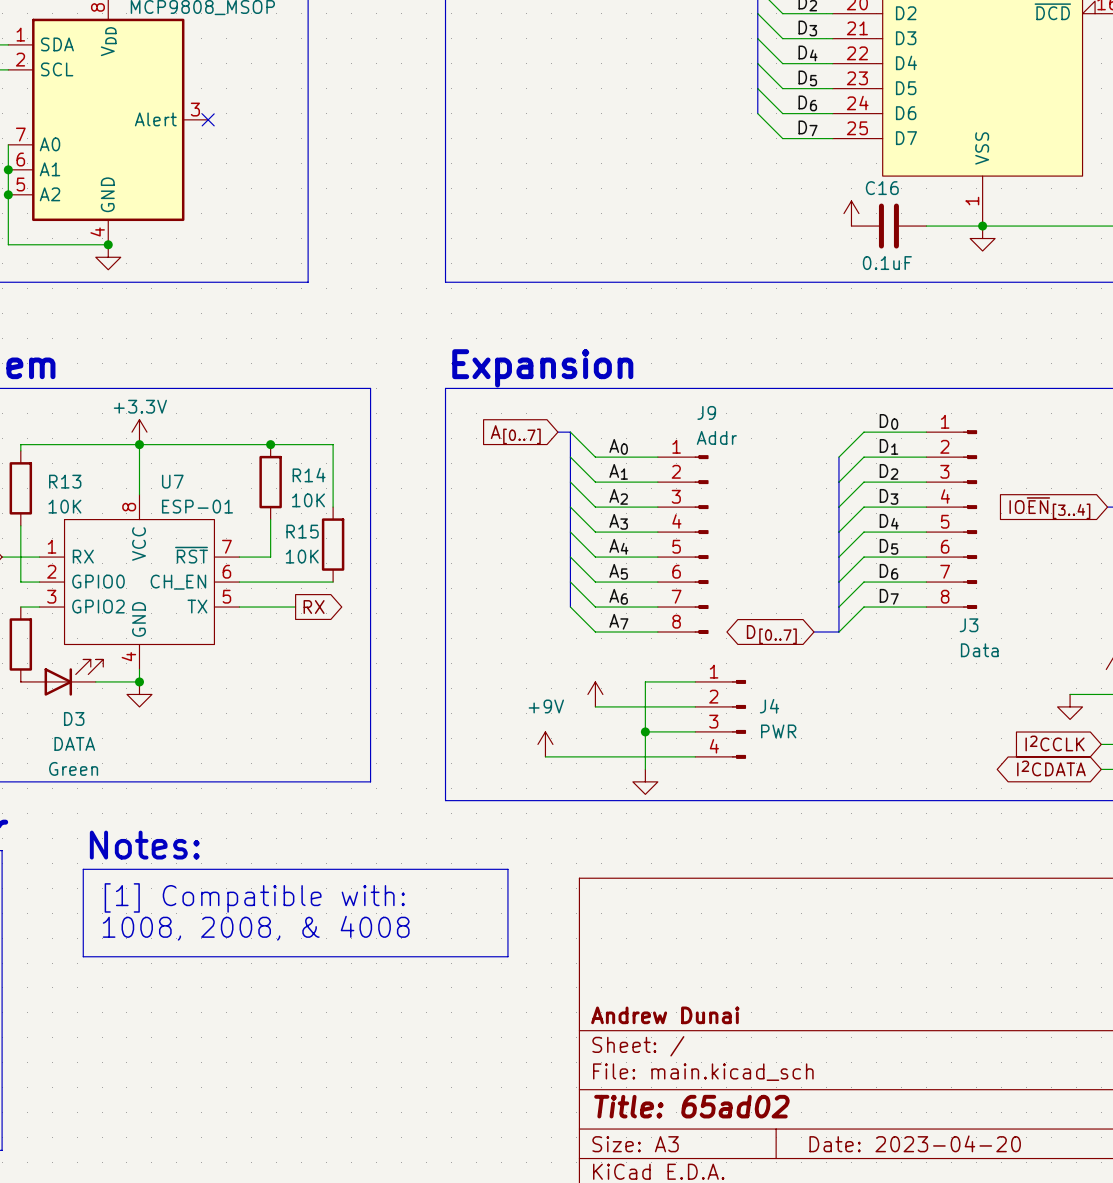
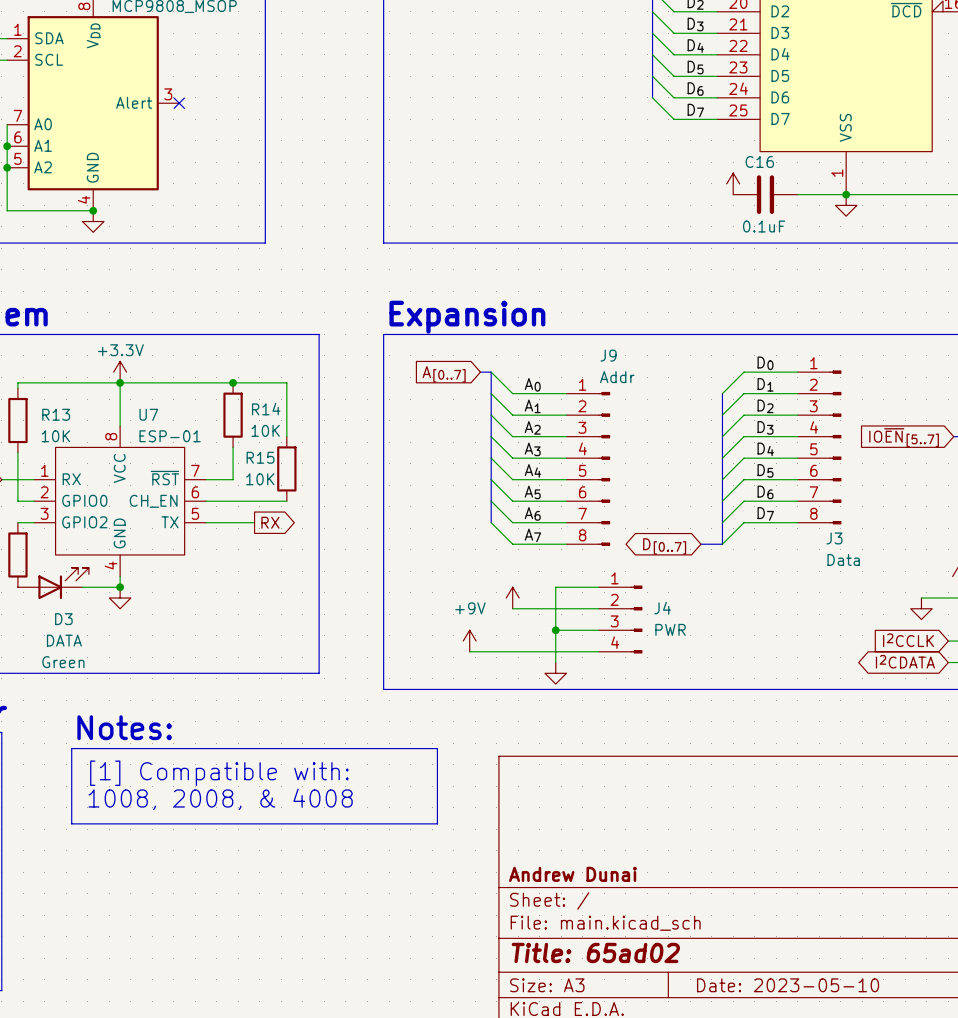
global label: IO~{EN}[3..4] (1049, 508) -> IO~{EN}[5..7] (904, 437)
title block: Date: 2023-04-20 (915, 1143) -> Date: 2023-05-10 (788, 985)

